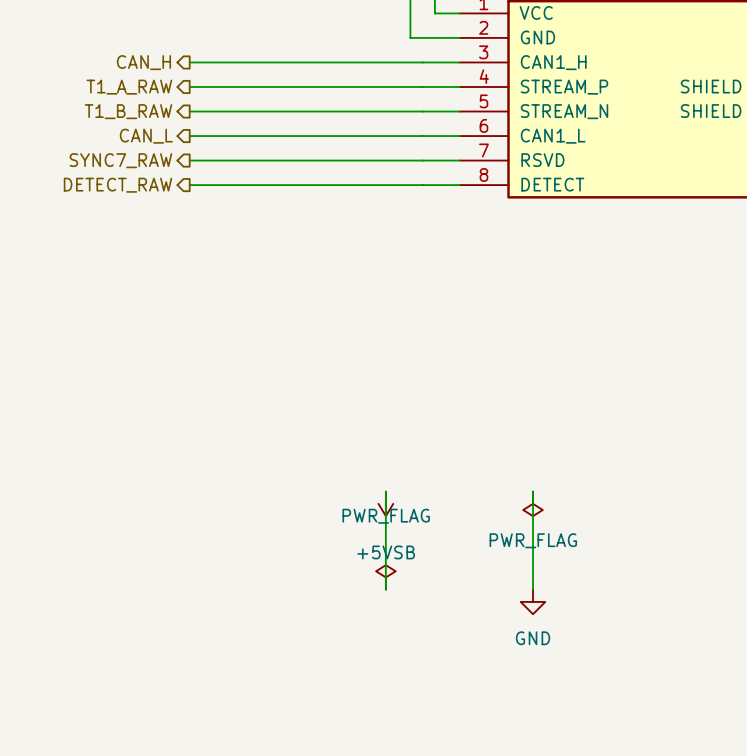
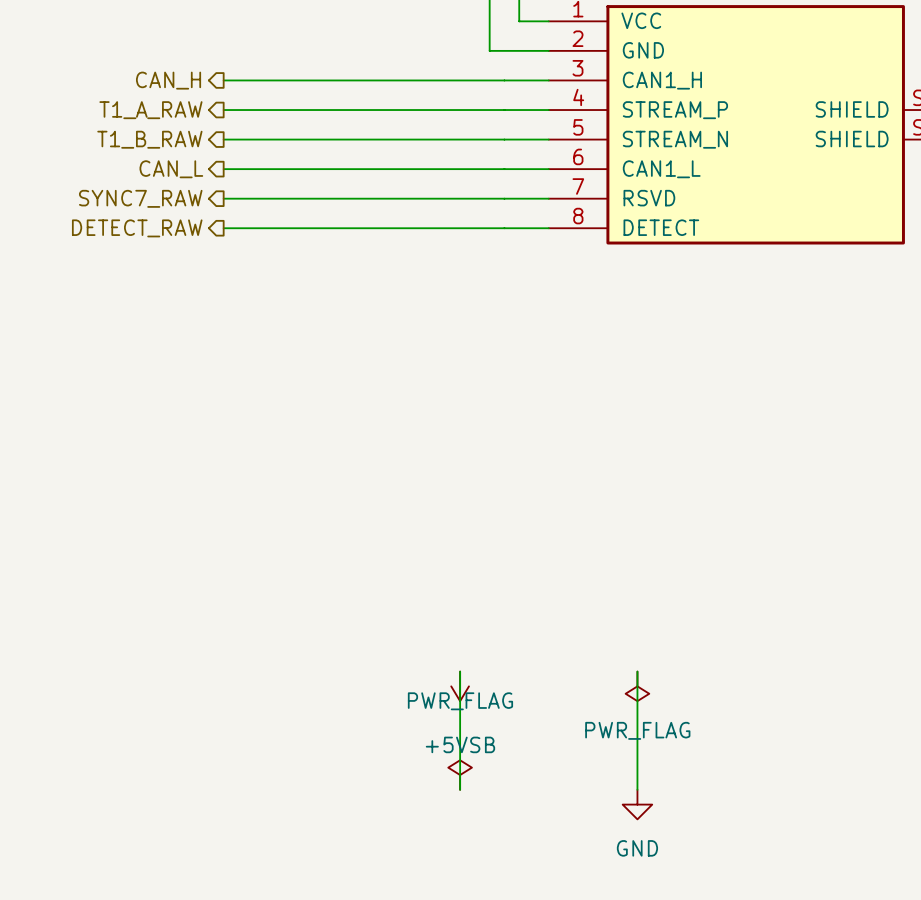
wire: (385, 491) (385, 552) -> (460, 715) (460, 789)
wire: (533, 491) (533, 552) -> (637, 715) (637, 789)
power symbol position: +5VSB (385, 503) -> +5VSB (460, 686)
power symbol position: PWR_FLAG (533, 503) -> PWR_FLAG (637, 686)
power symbol position: PWR_FLAG (385, 577) -> PWR_FLAG (460, 775)
power symbol position: GND (533, 601) -> GND (637, 804)

